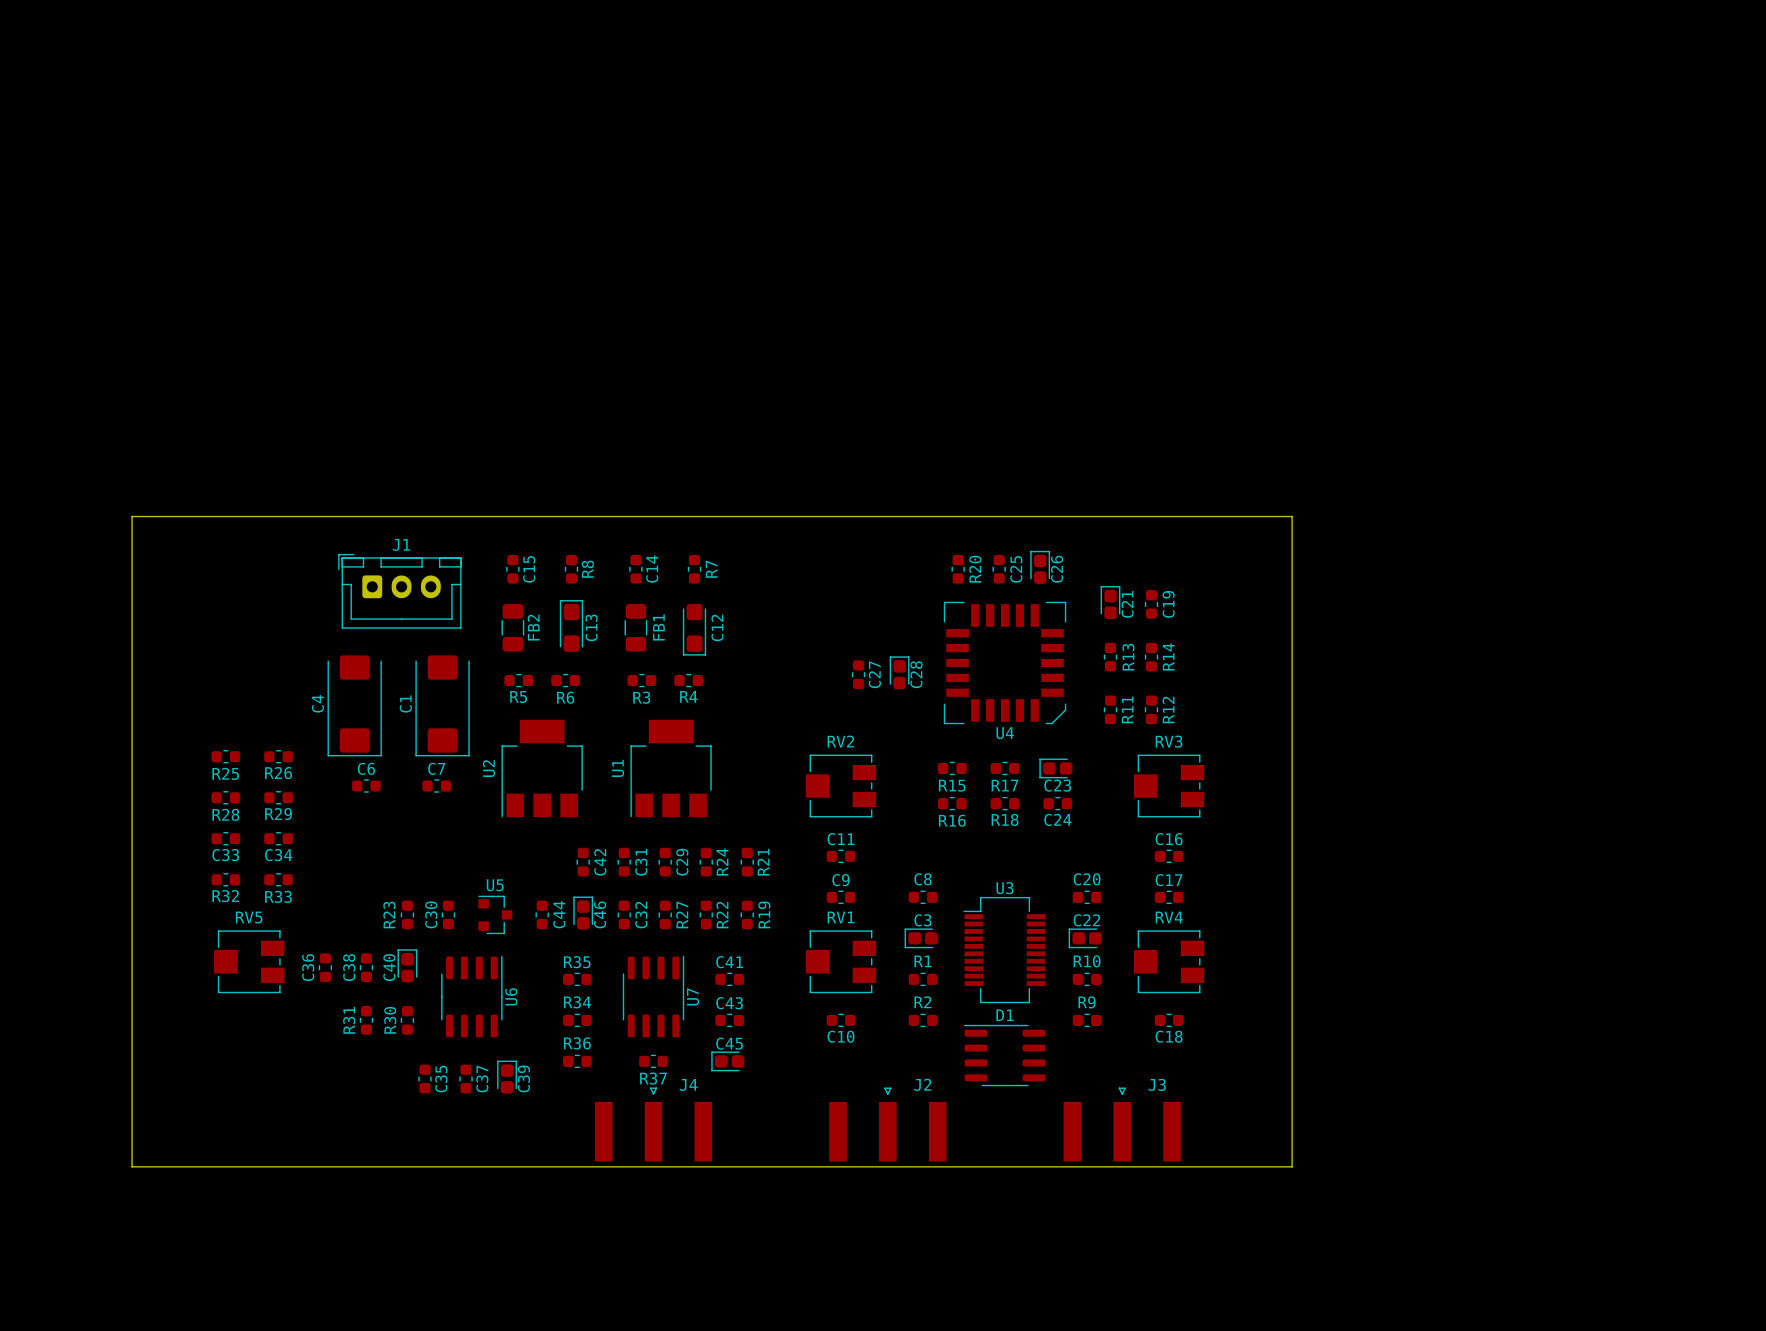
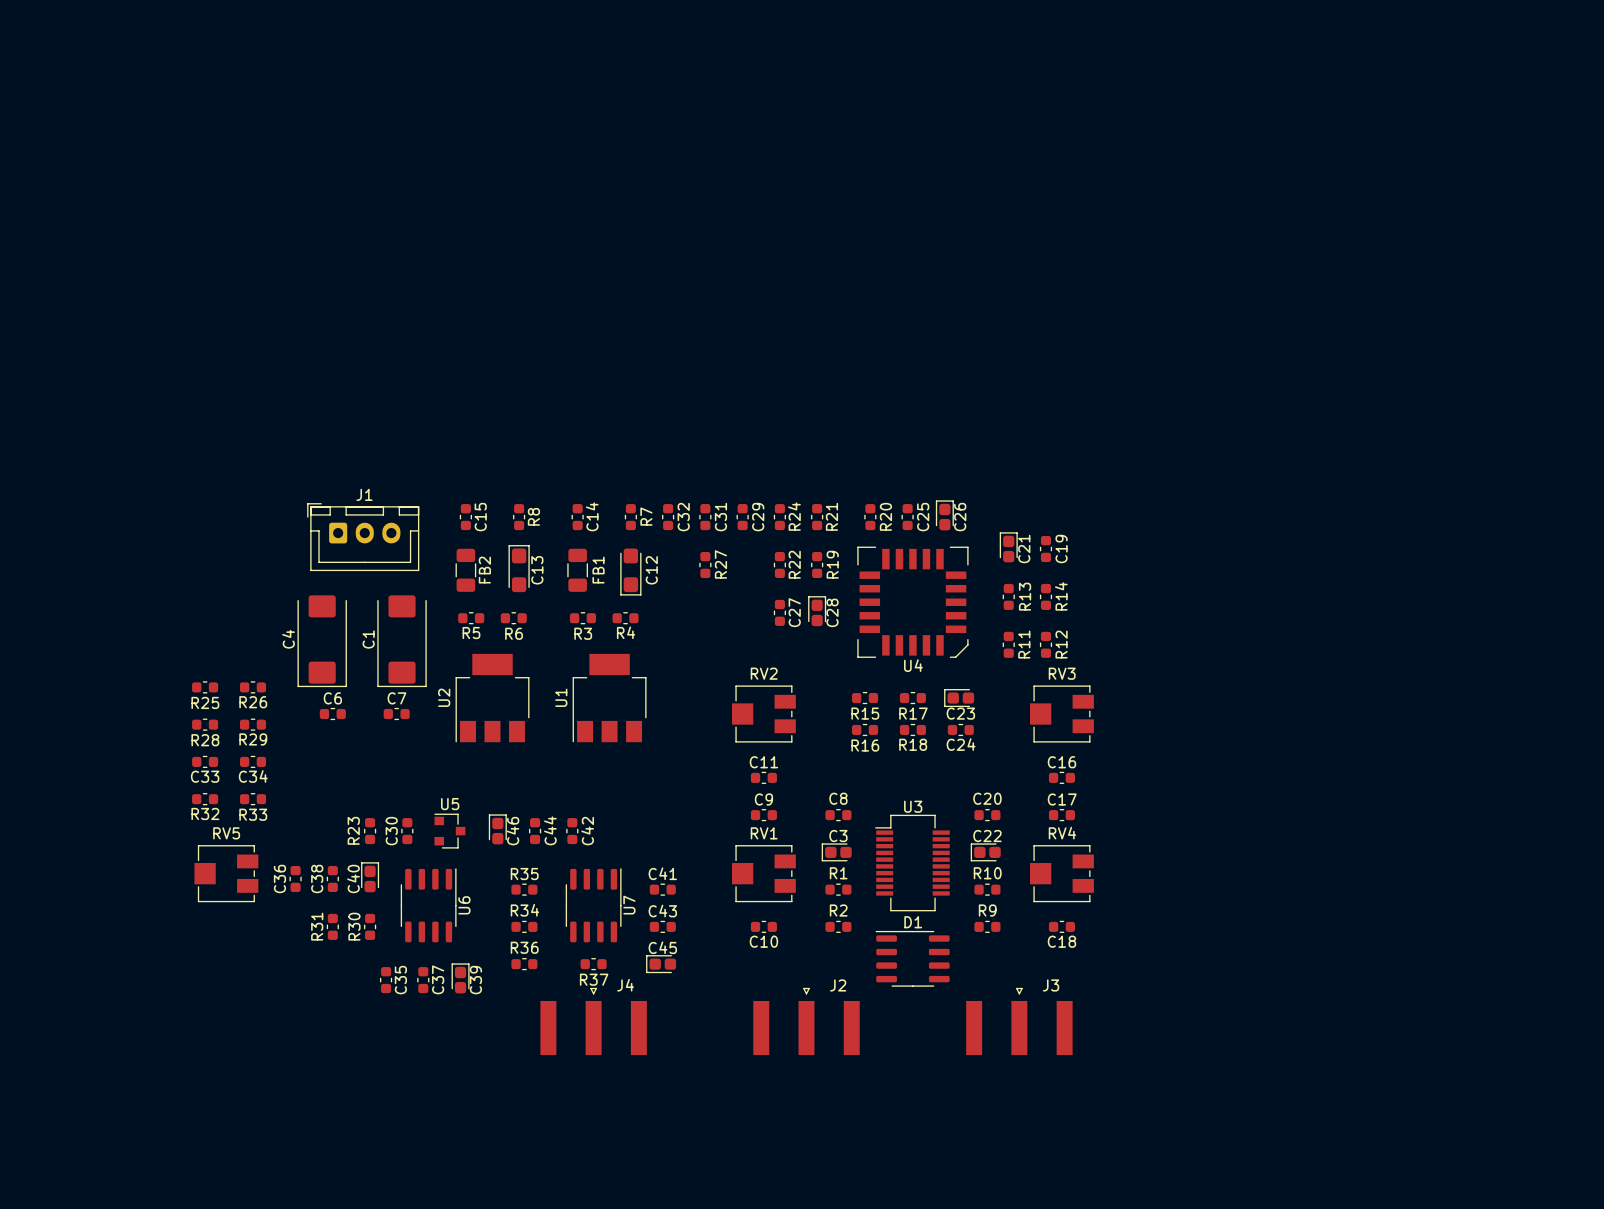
board edge: (132, 516) (132, 1166) (1292, 1166) (1292, 516) (132, 516) -> none
C42 position: (583, 862) -> (572, 831)
C31 position: (624, 862) -> (705, 517)
C29 position: (665, 862) -> (742, 517)
R24 position: (706, 862) -> (779, 517)
R21 position: (747, 862) -> (817, 517)
C46 position: (583, 913) -> (497, 829)
C44 position: (542, 914) -> (535, 831)
C32 position: (624, 914) -> (668, 517)
R27 position: (665, 914) -> (705, 564)
R22 position: (706, 914) -> (779, 564)
R19 position: (747, 914) -> (817, 564)

